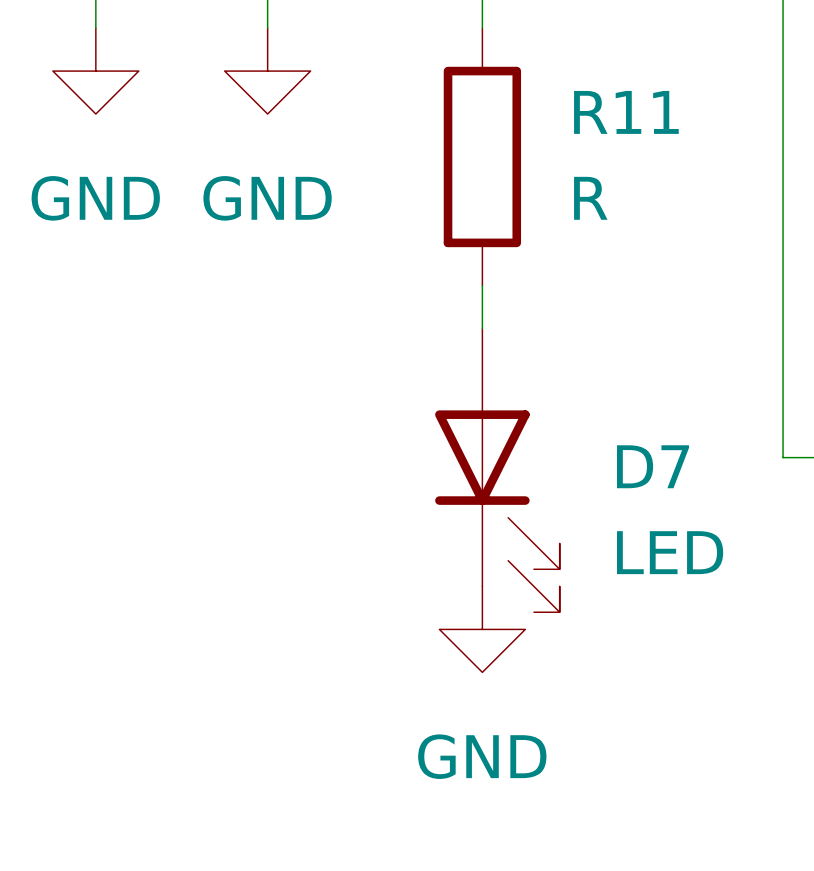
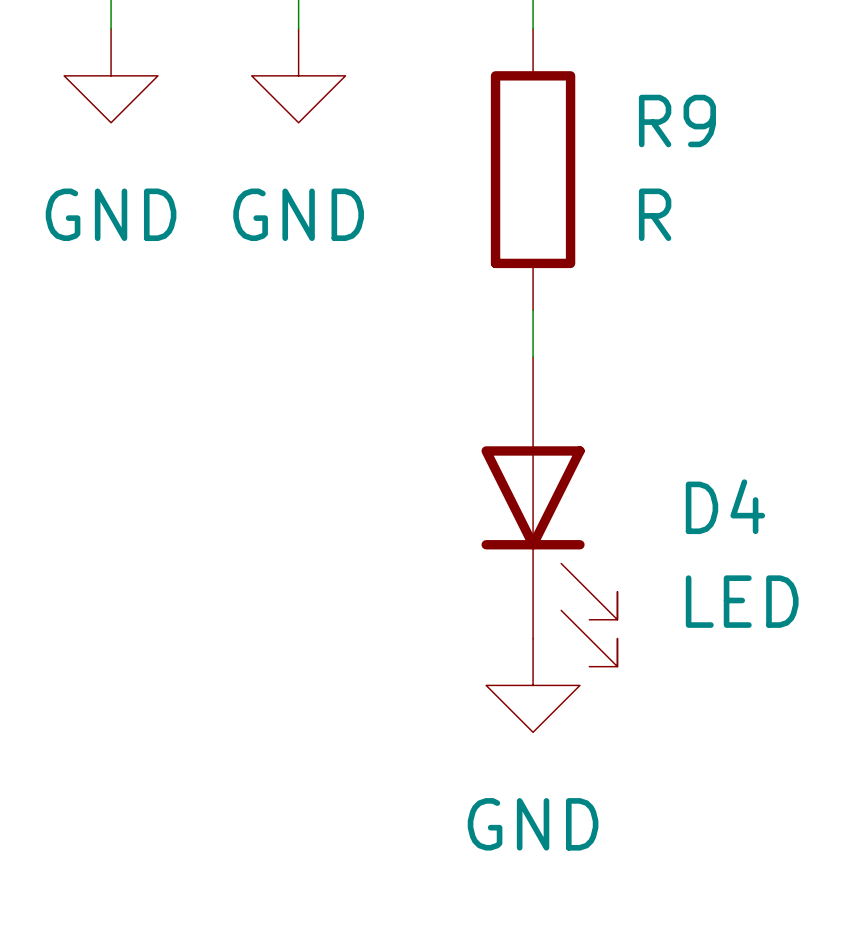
R11 name: R11 (626, 112) -> R9 (677, 120)
D7 name: D7 (653, 466) -> D4 (725, 506)

